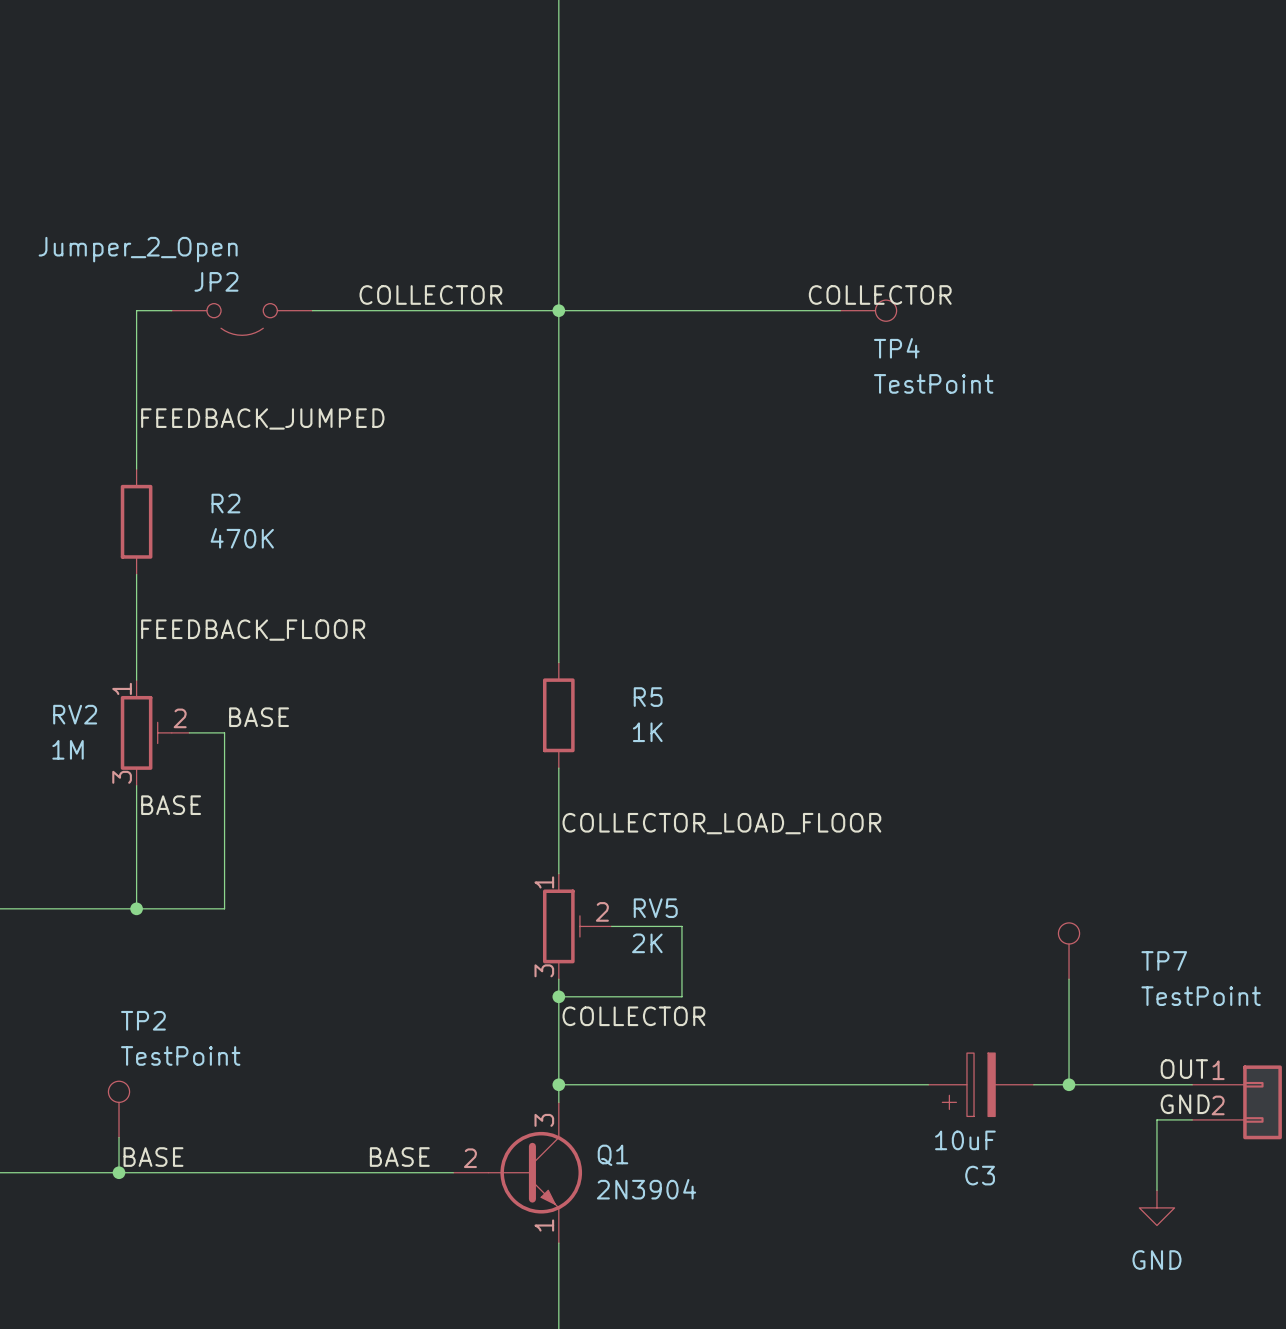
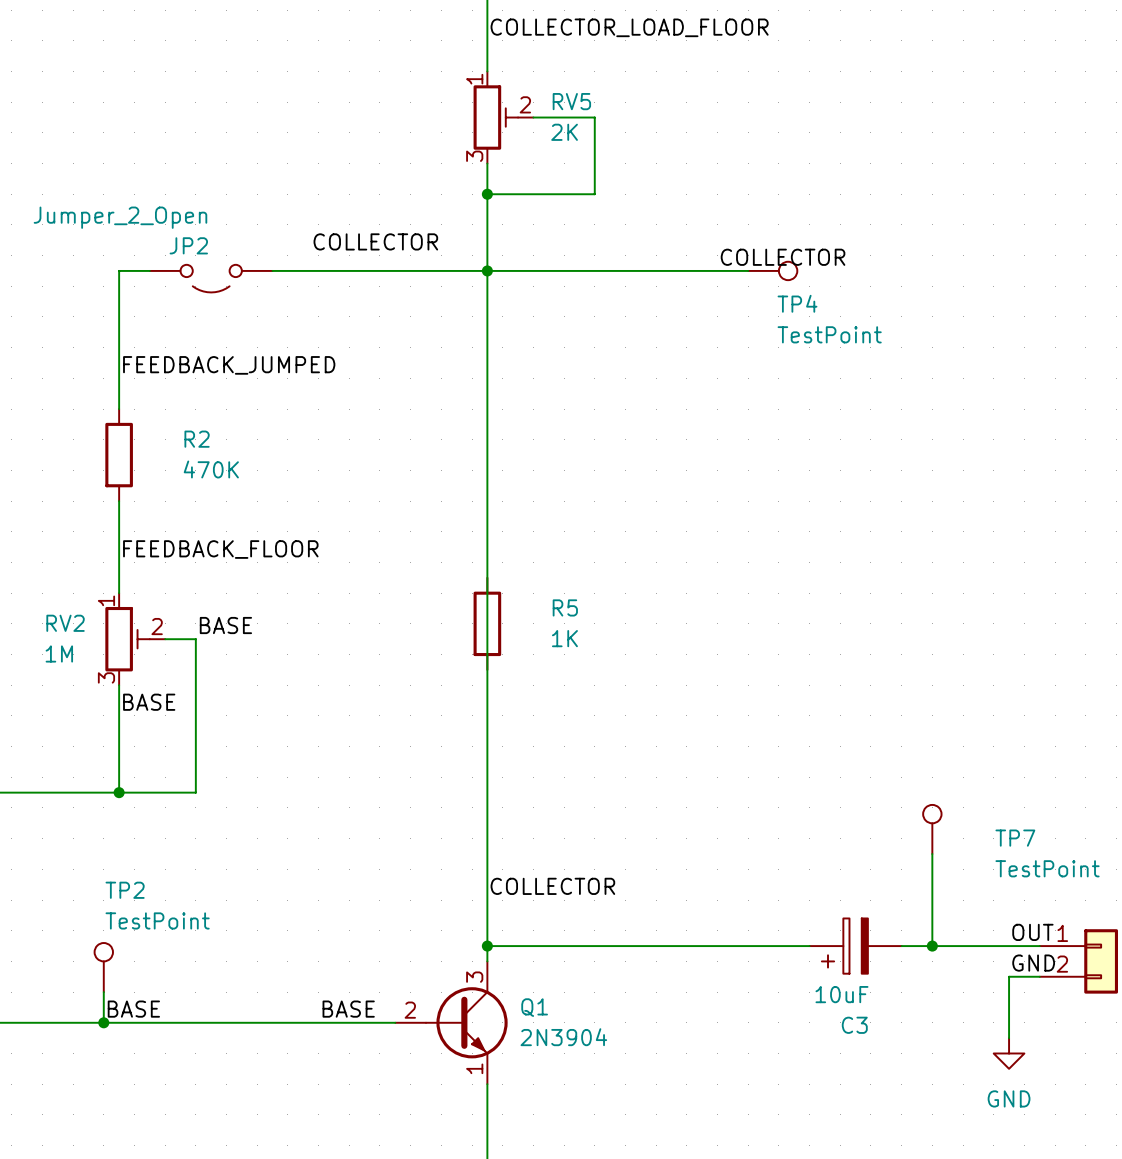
label: none -> COLLECTOR_LOAD_FLOOR (629, 27)
wire: (558, 81) (558, 187) -> none
wire: none -> (533, 117) (594, 117) (594, 194) (487, 194)
junction: none -> (487, 194)
label position: COLLECTOR (430, 294) -> COLLECTOR (375, 241)
label position: COLLECTOR (880, 294) -> COLLECTOR (783, 257)
TP4 position: (868, 310) -> (772, 270)
wire: none -> (487, 577) (487, 669)
label: COLLECTOR_LOAD_FLOOR (721, 823) -> none
wire: none -> (487, 761) (487, 854)
RV5 position: (577, 926) -> (503, 117)
wire: (611, 926) (681, 926) (681, 996) (558, 996) -> none
junction: (558, 996) -> none

